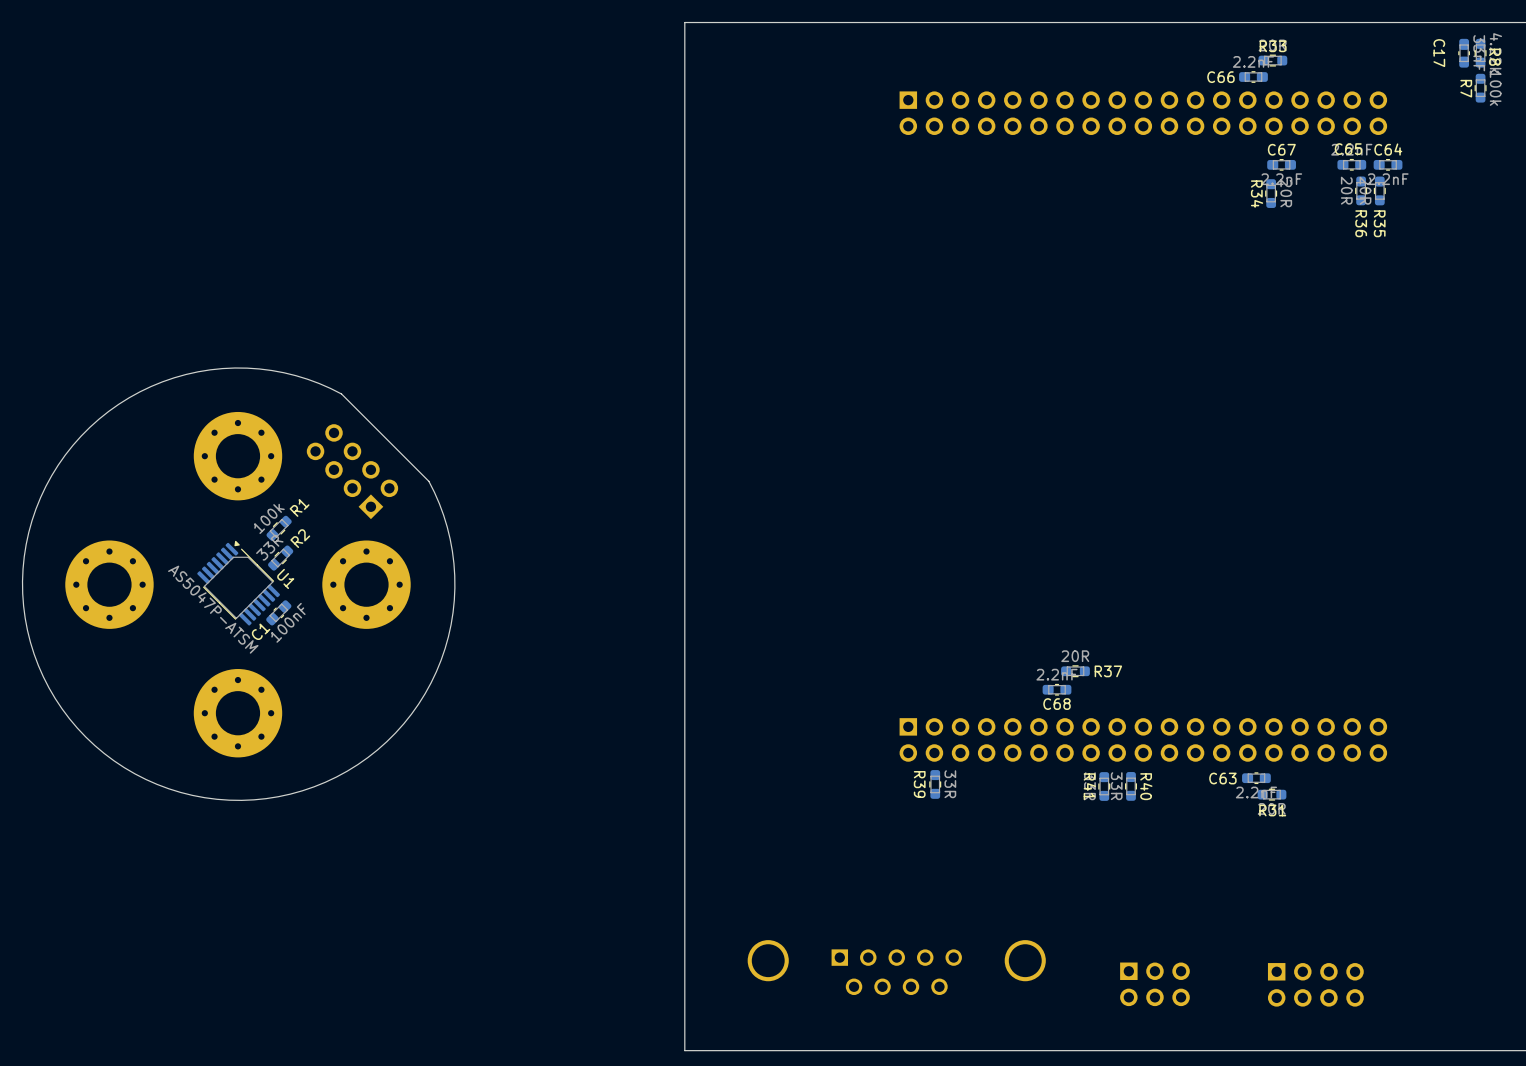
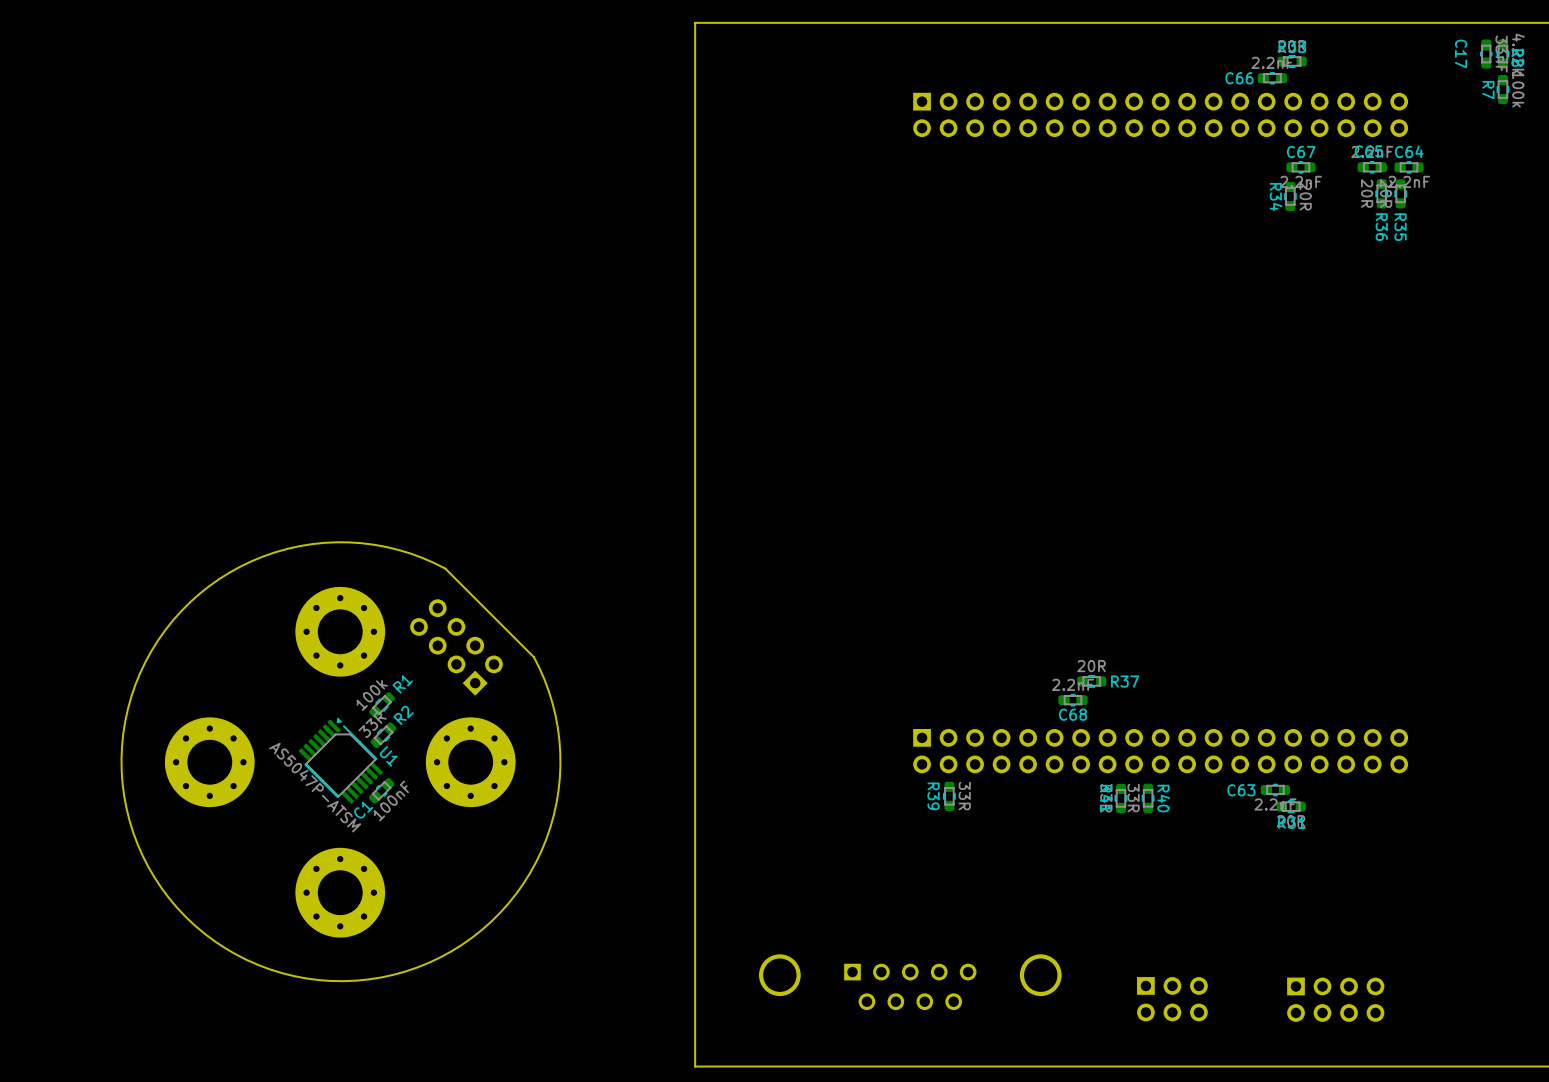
board edge: (341, 393) (428, 481) (443, 515) (452, 551) (454, 600) (448, 636) (431, 682) (411, 714) (377, 749) (347, 771) (302, 790) (266, 798) (216, 799) (180, 792) (135, 773) (94, 745) (69, 718) (43, 676) (30, 642) (22, 593) (24, 556) (32, 520) (45, 486) (72, 445) (99, 419) (140, 391) (174, 377) (210, 369) (259, 368) (307, 379) (341, 393) -> (445, 568) (534, 657) (549, 691) (557, 728) (559, 778) (550, 827) (536, 861) (508, 903) (481, 929) (451, 951) (405, 971) (368, 979) (318, 980) (270, 969) (235, 954) (204, 933) (169, 898) (148, 866) (129, 820) (122, 783) (123, 733) (131, 697) (151, 651) (172, 620) (209, 586) (240, 566) (287, 548) (337, 542) (374, 544) (410, 553) (445, 568)
part: (237, 456) -> none
part position: (352, 471) -> (456, 647)
R1 position: (279, 528) -> (381, 705)
R2 position: (280, 558) -> (383, 735)
U1 position: (238, 583) -> (340, 760)
part: (109, 584) -> none
part position: (366, 584) -> (340, 631)
C1 position: (278, 612) -> (381, 790)
part position: (237, 713) -> (209, 762)
part: none -> (470, 762)
part: none -> (340, 892)

